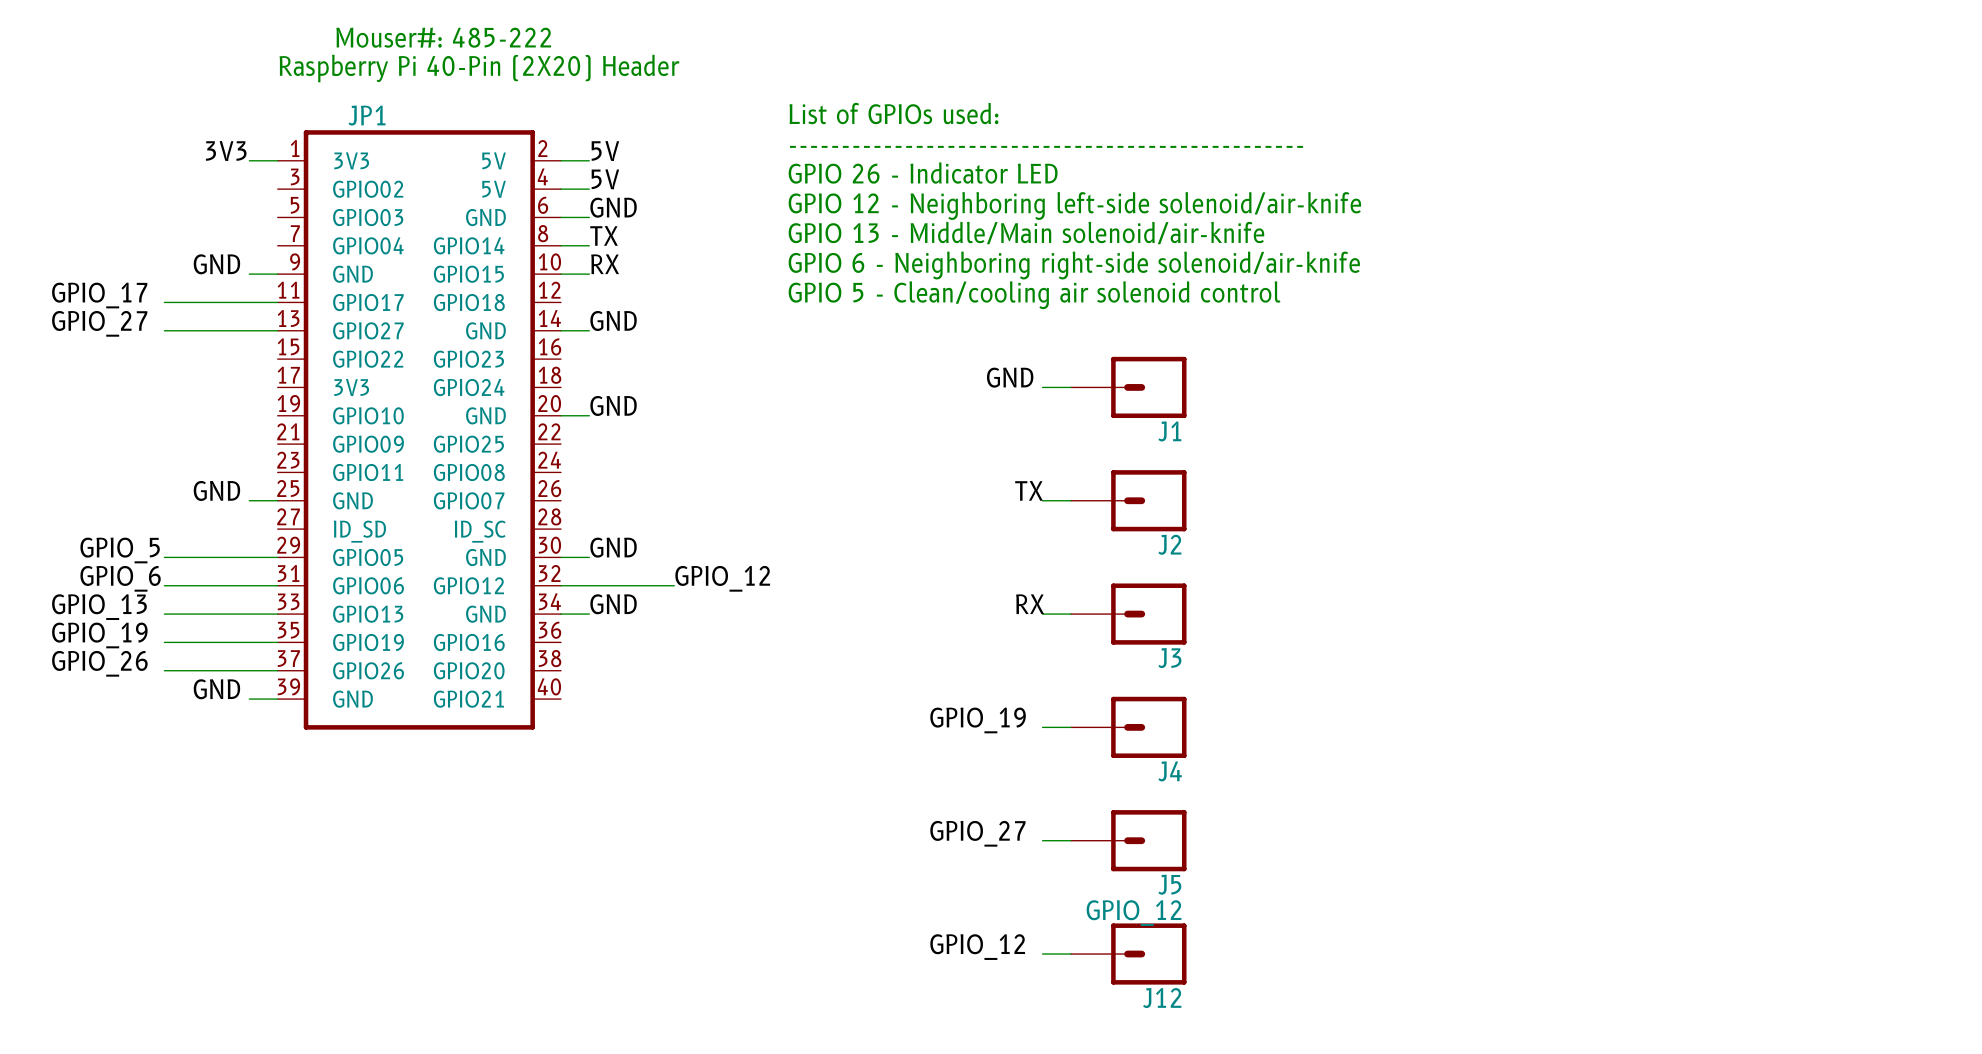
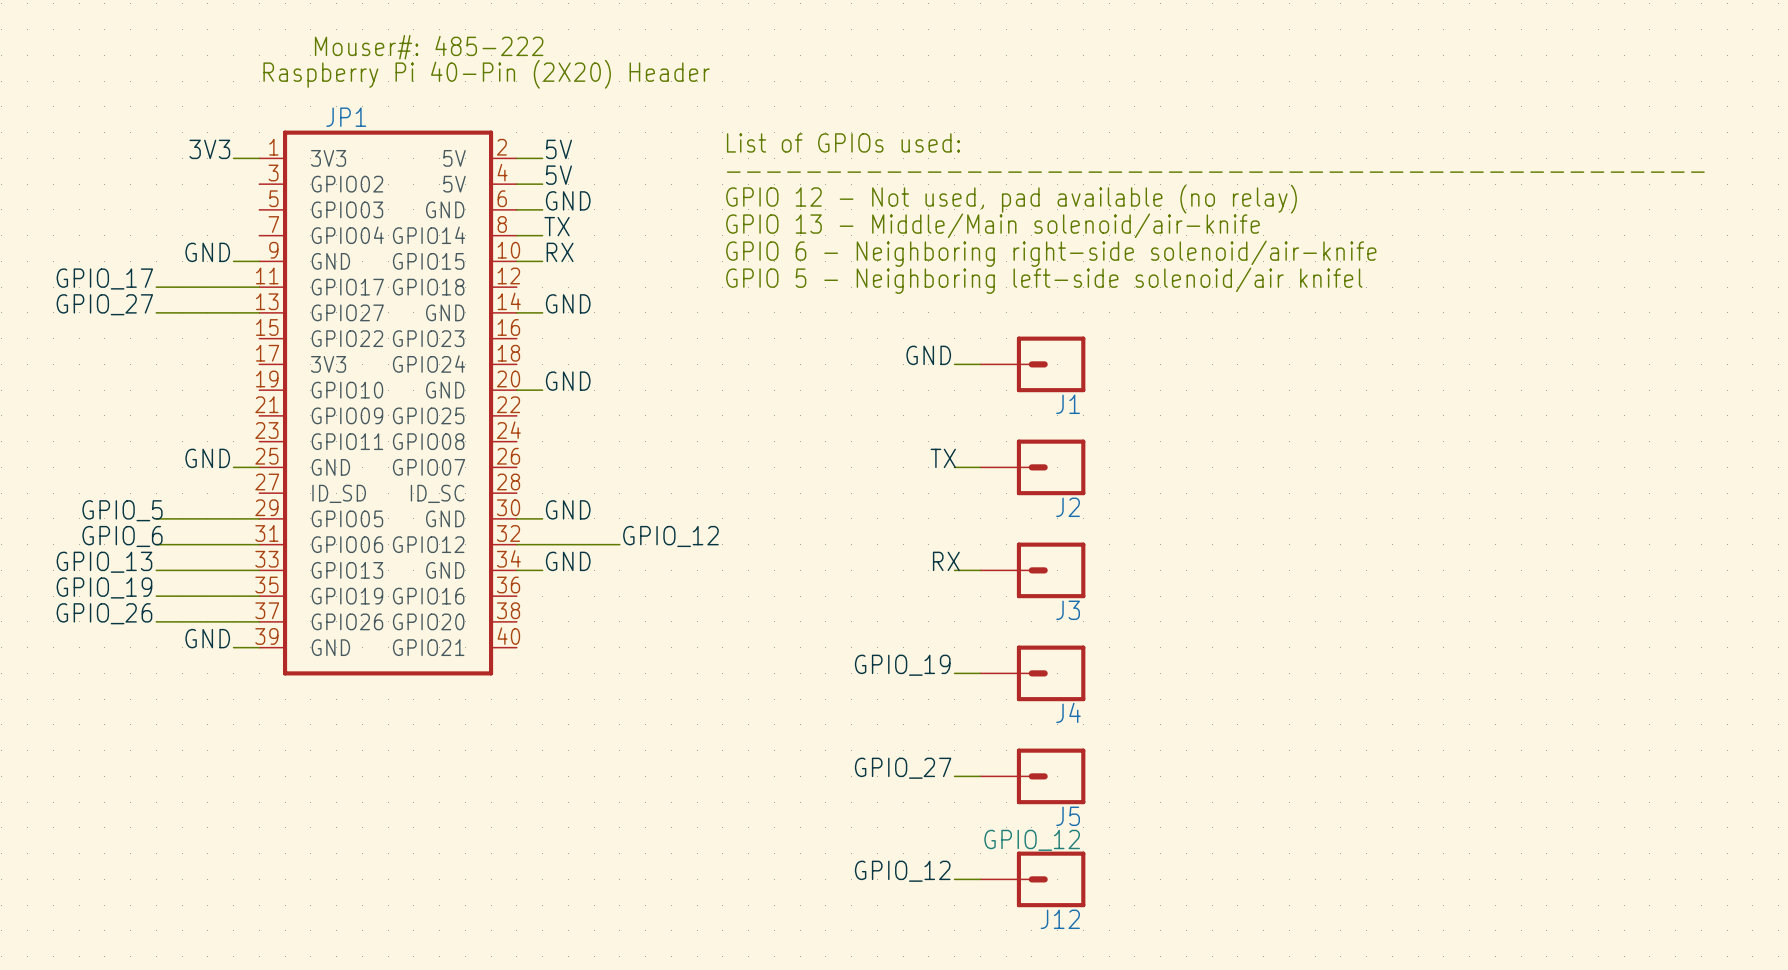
text: List of GPIOs used: (893, 113) -> none
text: ------------------------------------------------- (1046, 146) -> List of GPIOs used: (843, 142)
text: GPIO 26 - Indicator LED (923, 173) -> ------------------------------------------------- (1215, 172)
text: GPIO 12 - Neighboring left-side solenoid/air-knife (1074, 206) -> GPIO 12 - Not used, pad available (no relay) (1011, 199)
text: GPIO 5 - Clean/cooling air solenoid control (1034, 295) -> GPIO 5 - Neighboring left-side solenoid/air knifel (1044, 280)

